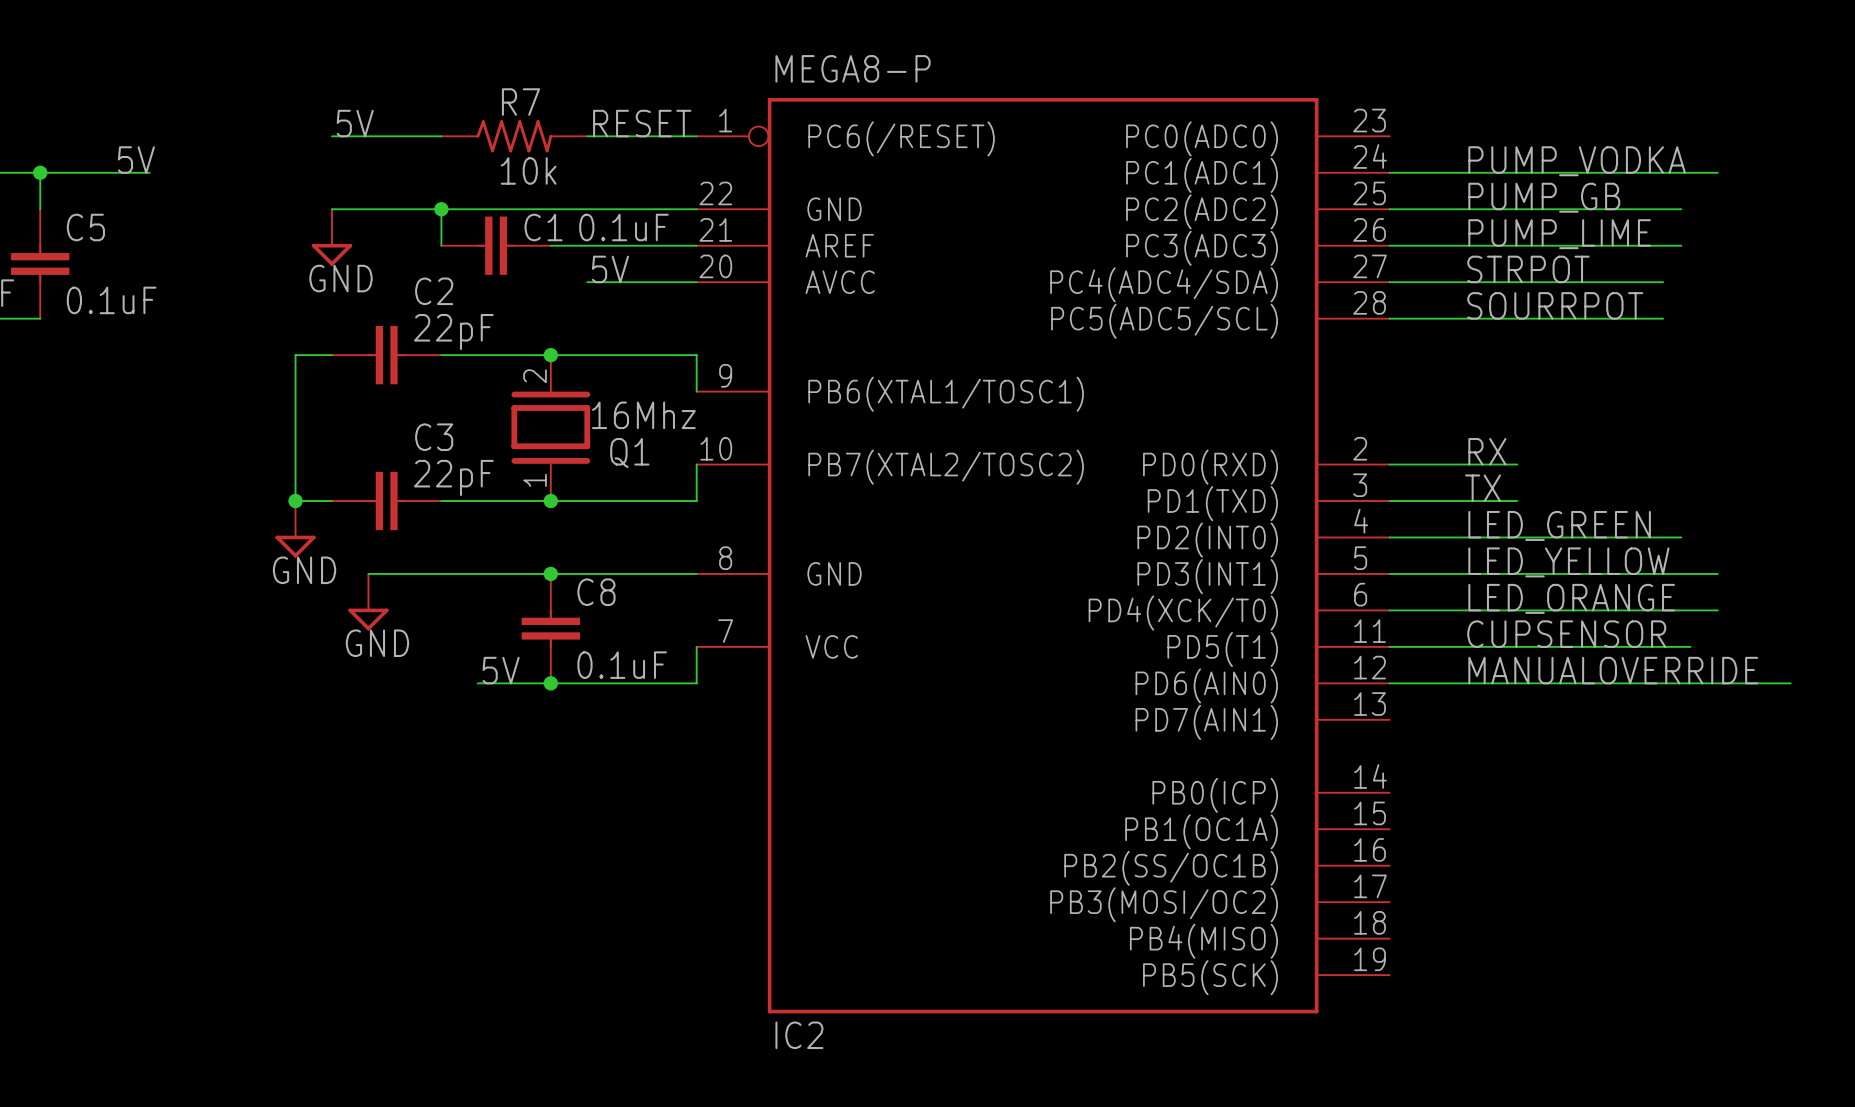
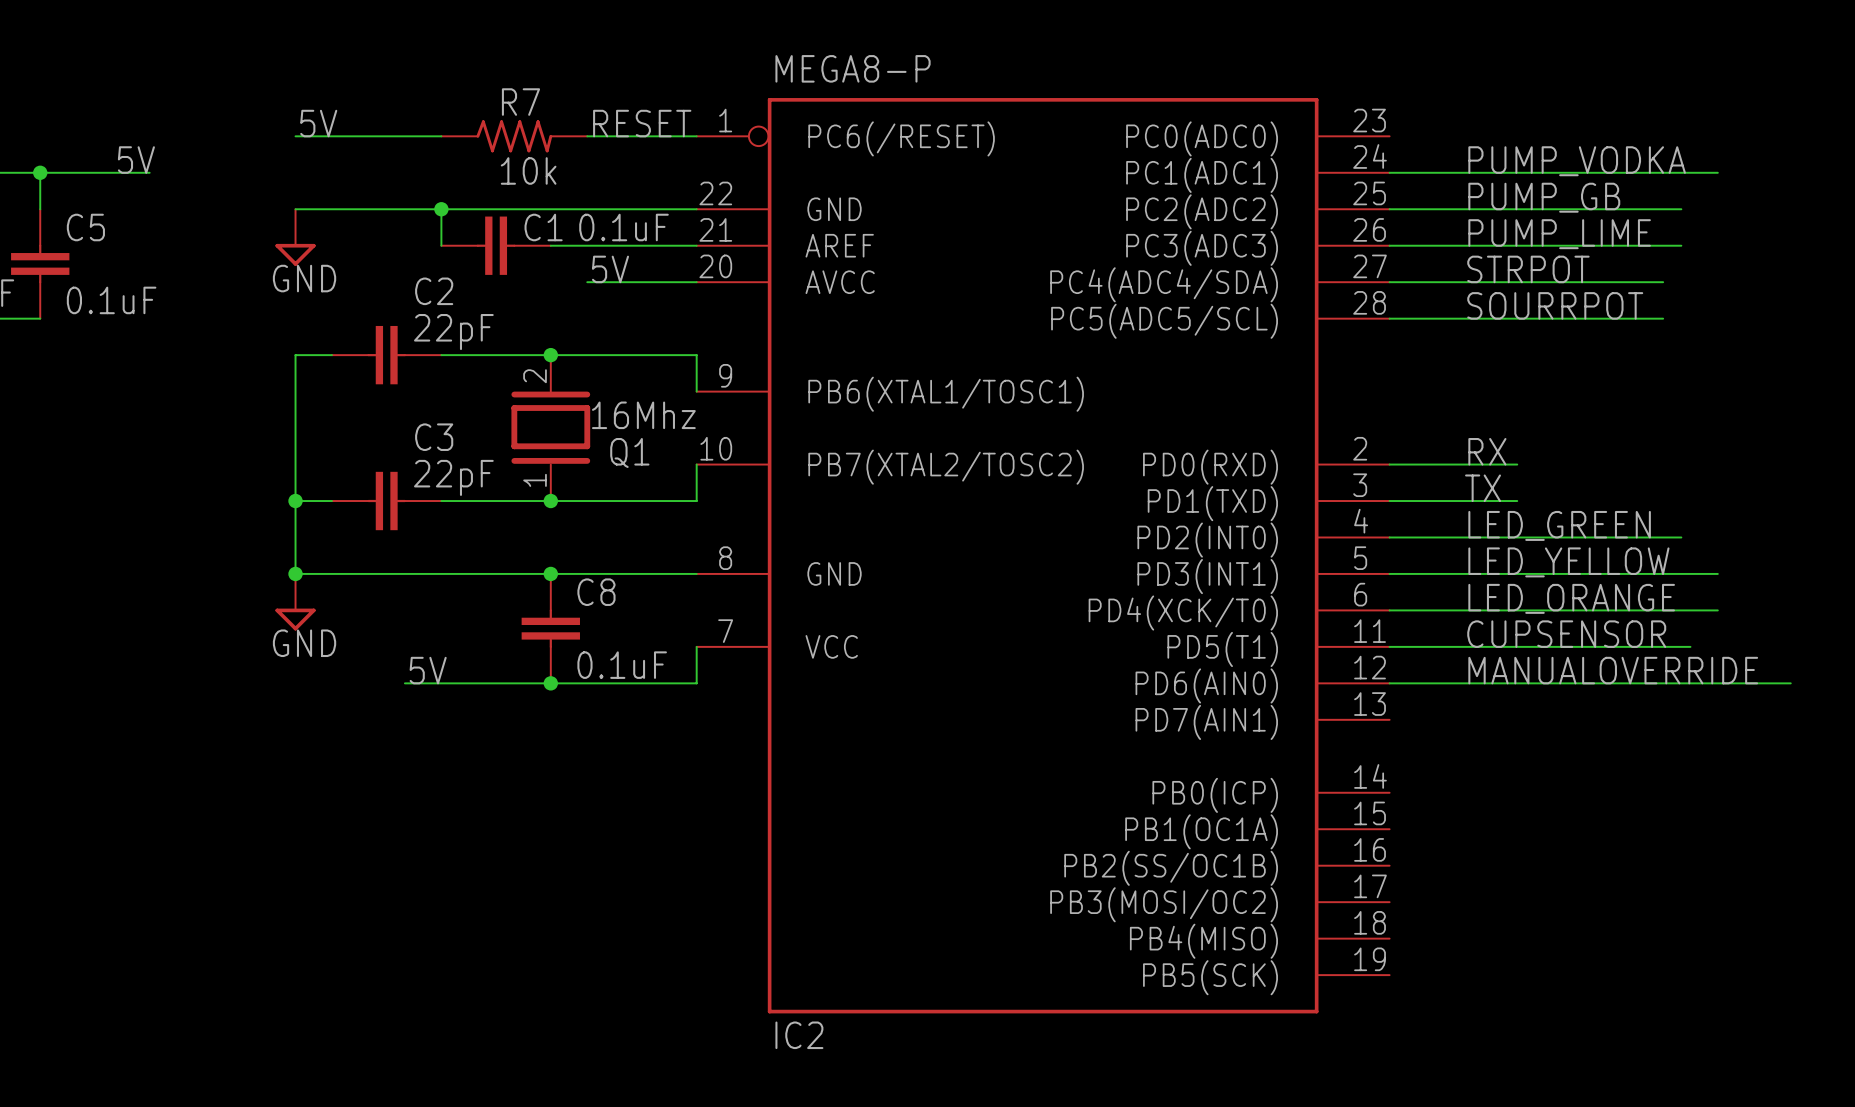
label position: 5V (355, 123) -> 5V (318, 123)
wire: none -> (295, 136) (331, 136)
wire: none -> (295, 209) (331, 209)
power symbol position: GND (331, 237) -> GND (295, 237)
wire: none -> (295, 501) (295, 573) (368, 573)
power symbol: GND (295, 529) -> none
junction: none -> (295, 573)
power symbol: none -> GND (295, 602)
power symbol: GND (368, 602) -> none
label position: 5V (501, 670) -> 5V (428, 670)
wire: none -> (404, 683) (477, 683)

